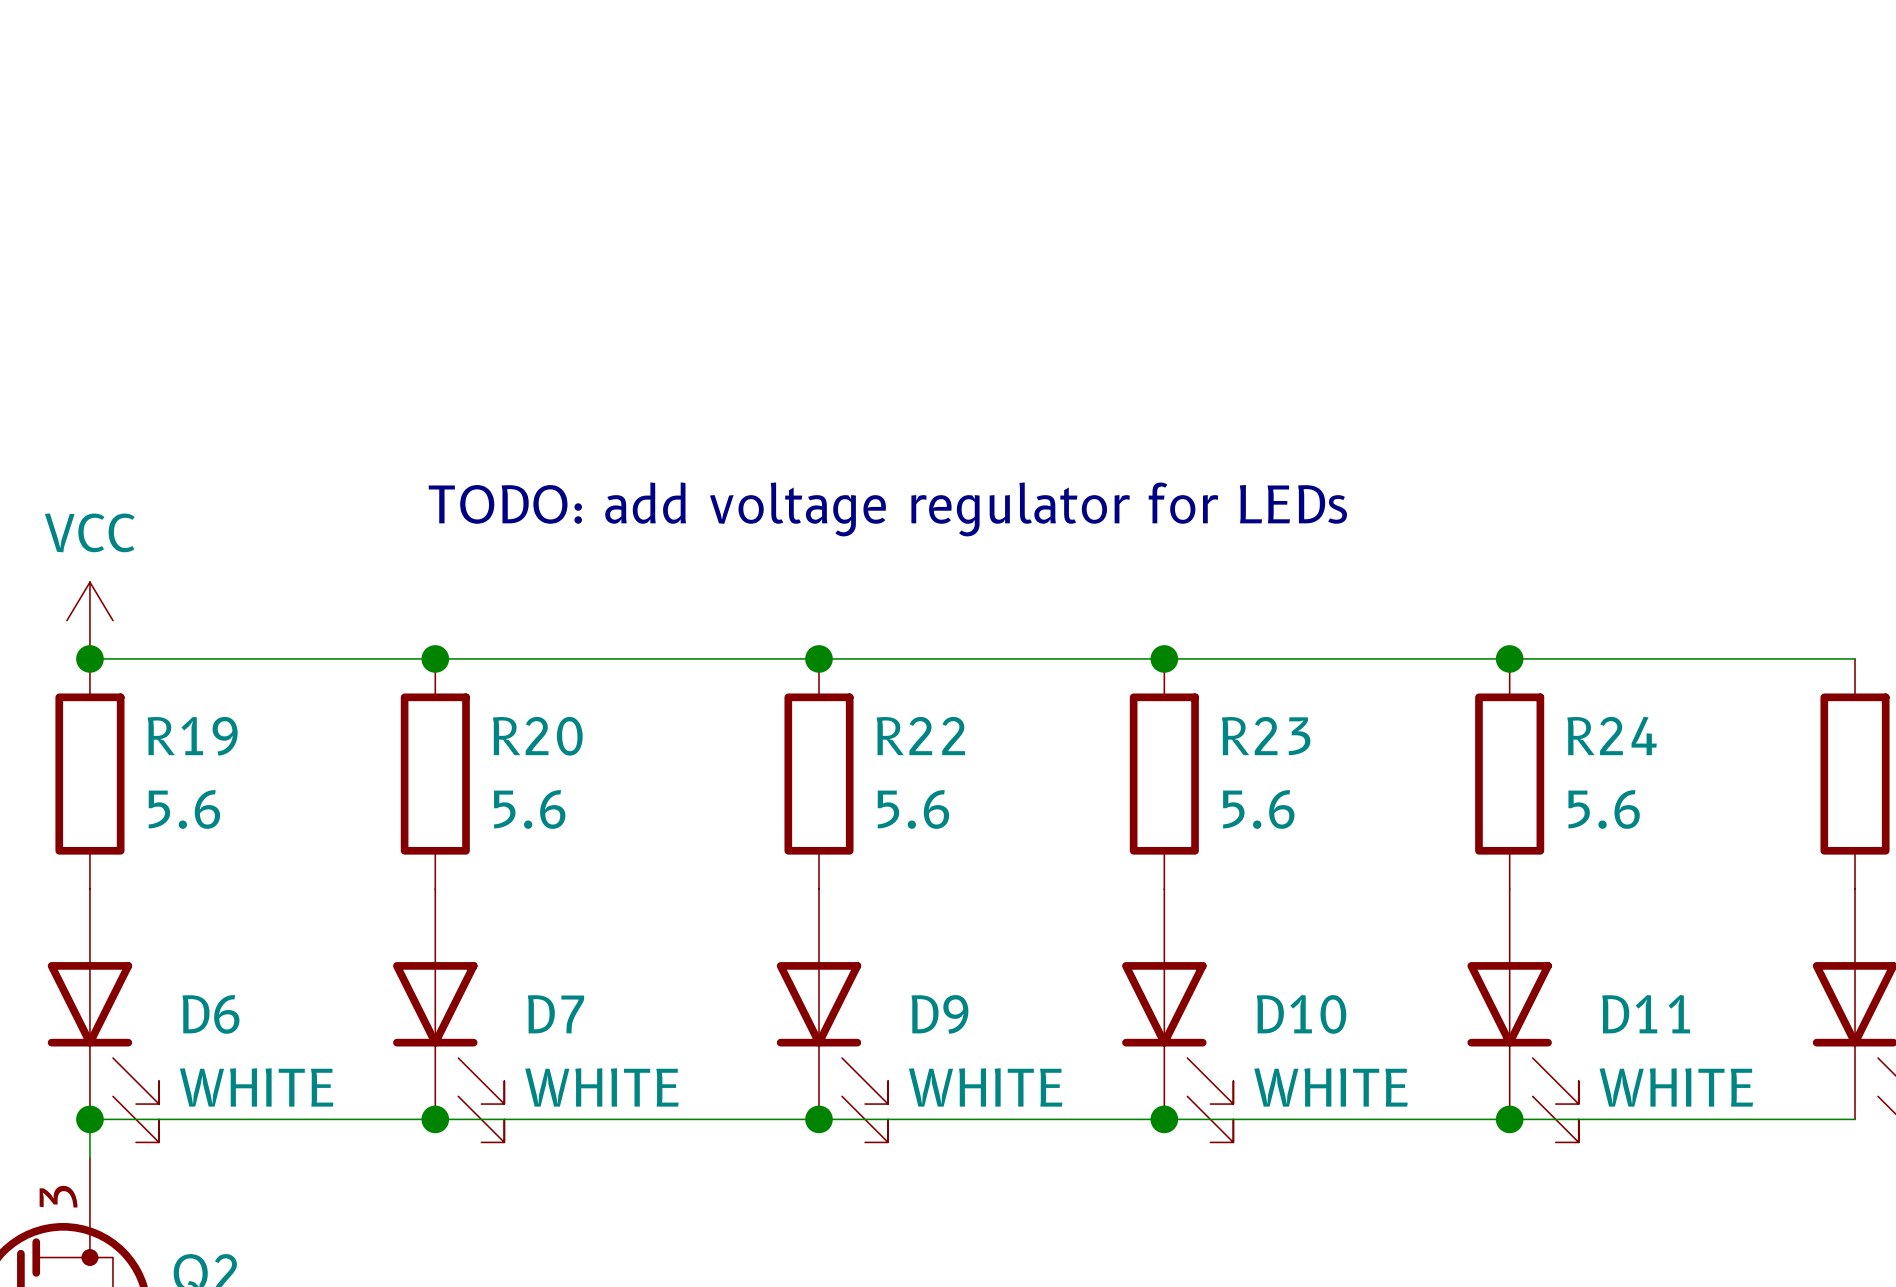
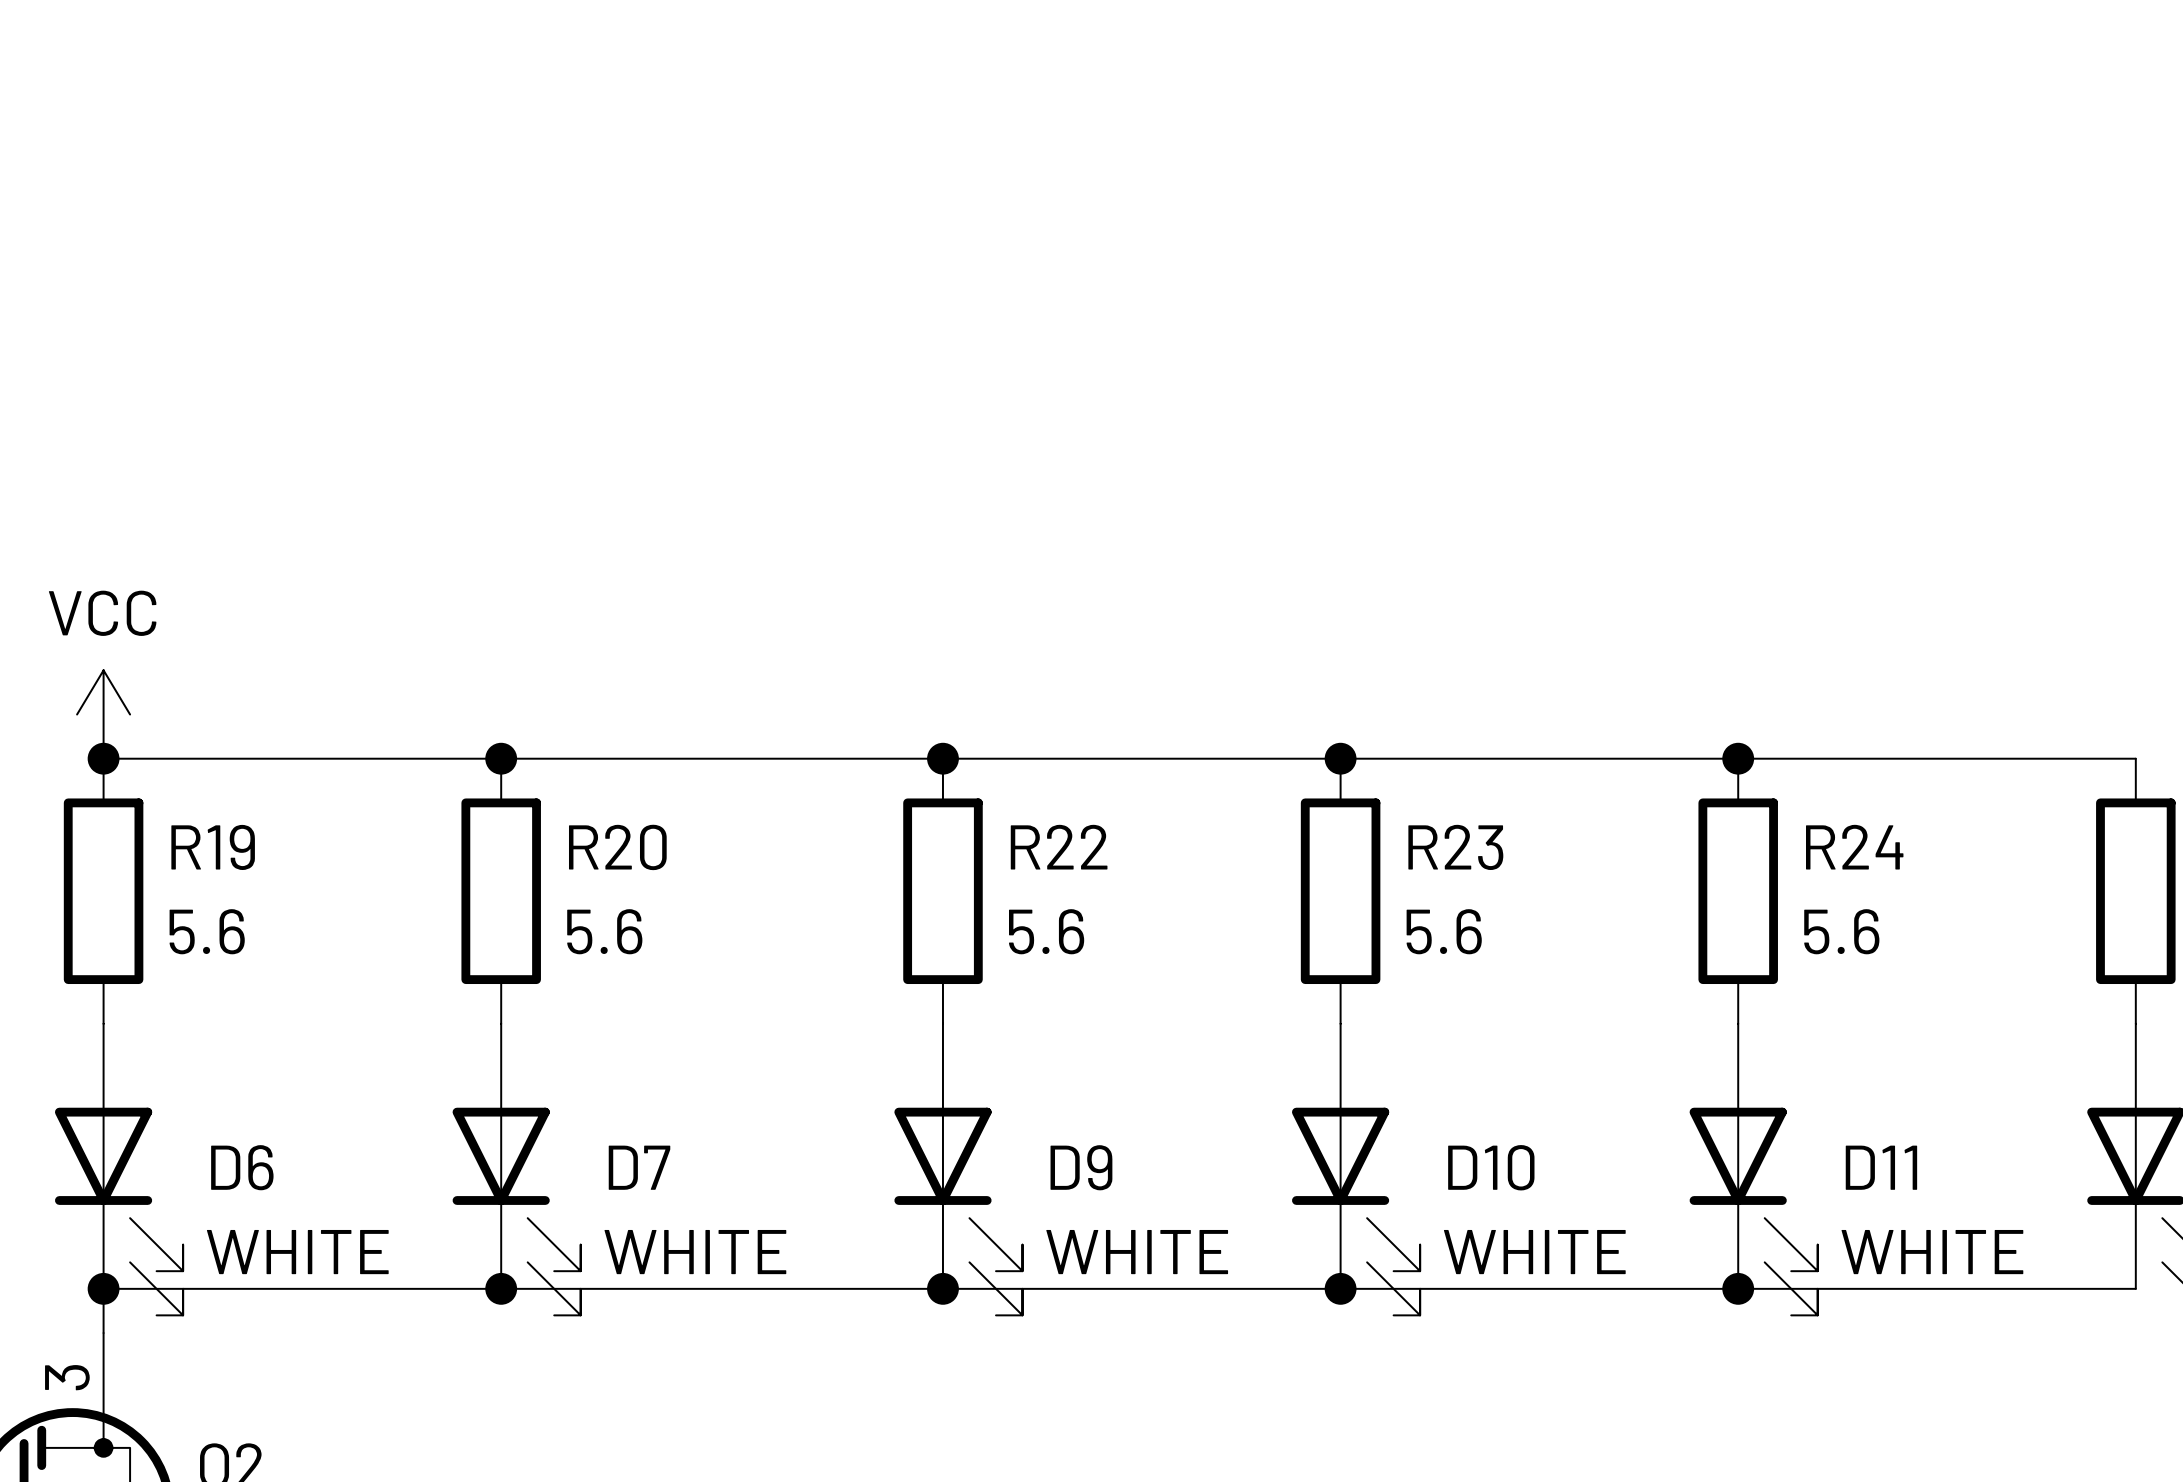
text: TODO: add voltage regulator for LEDs (887, 509) -> none

